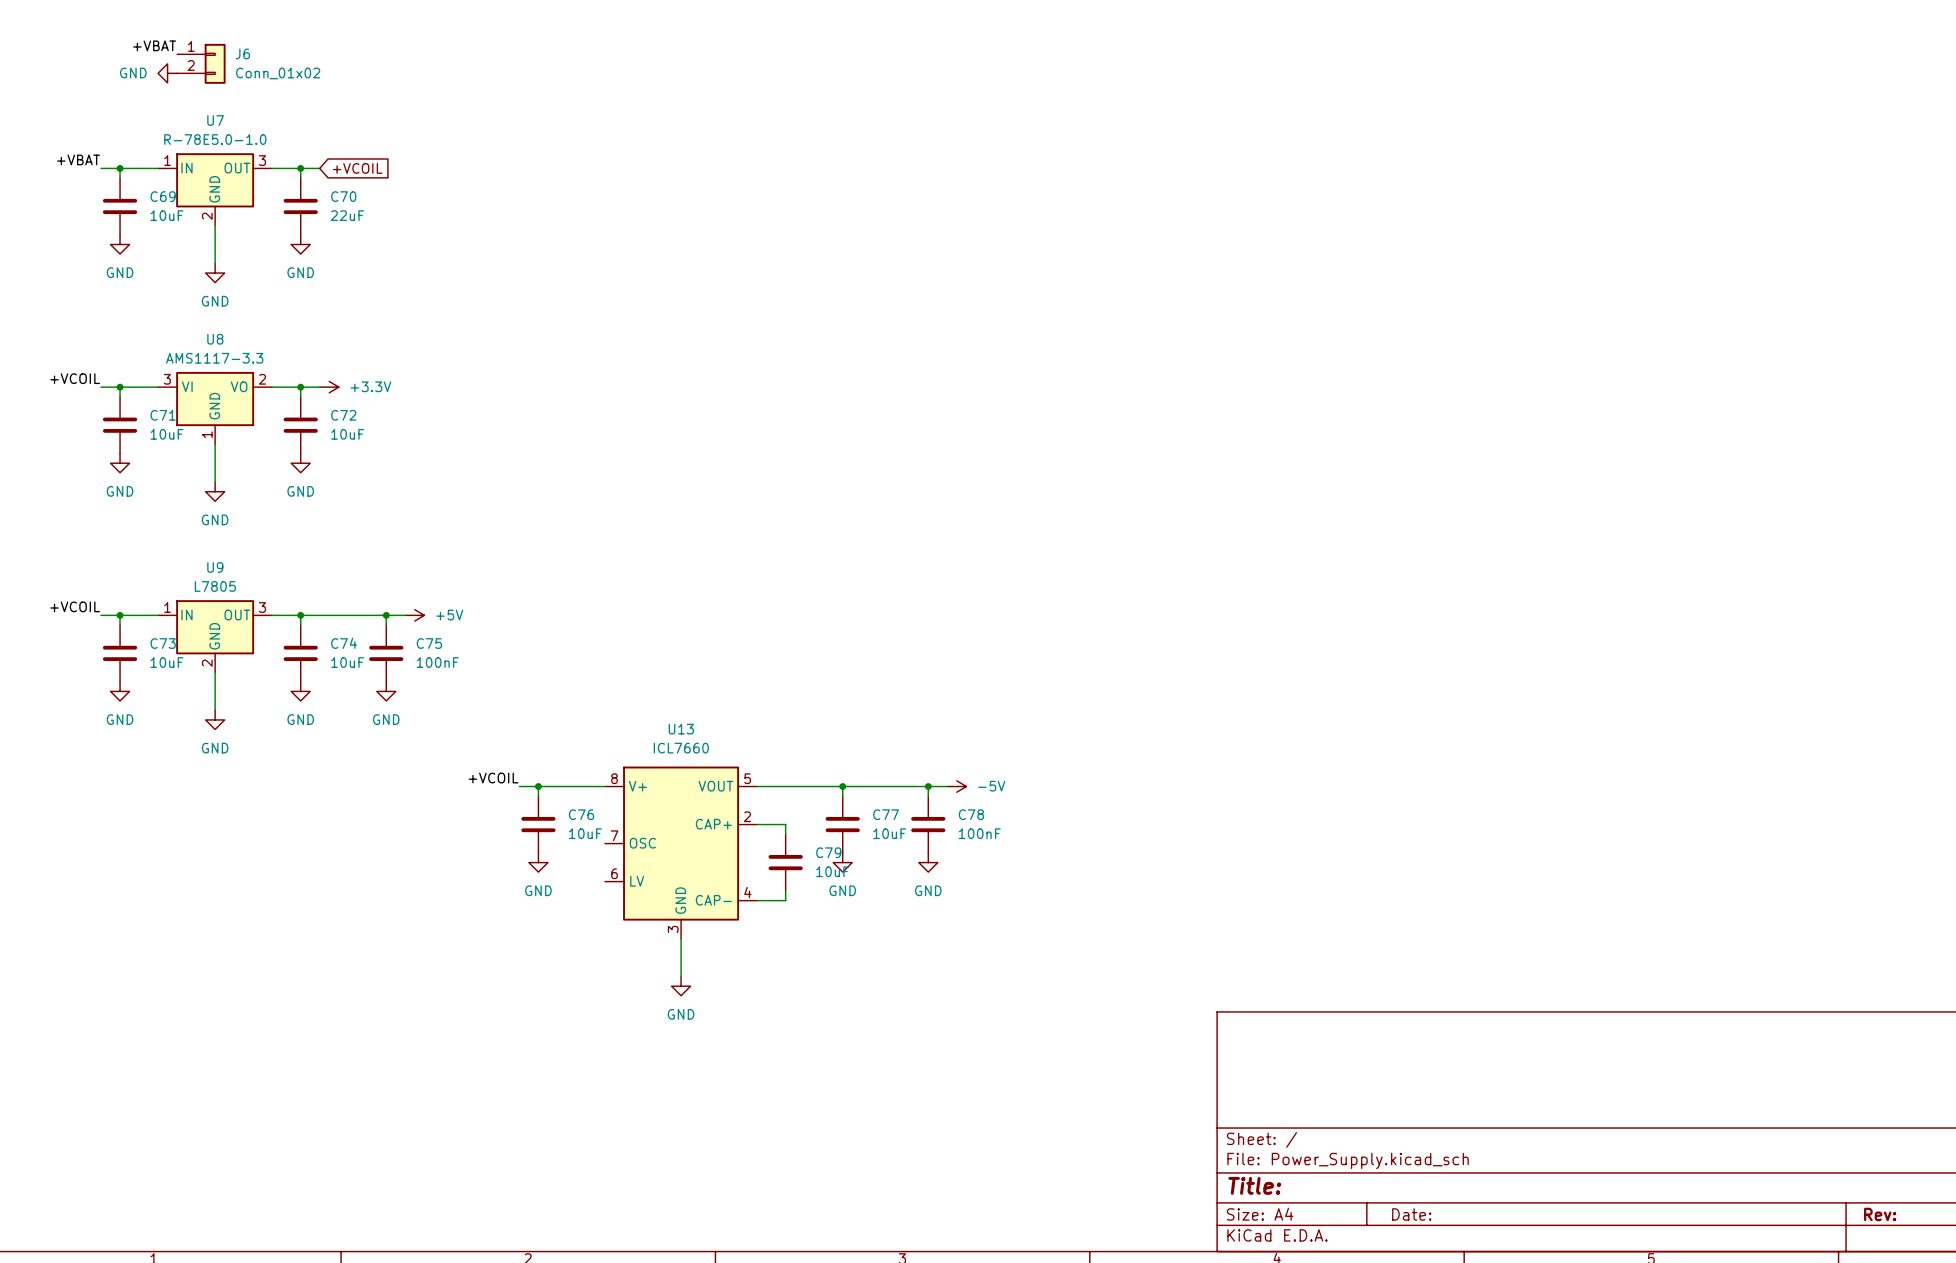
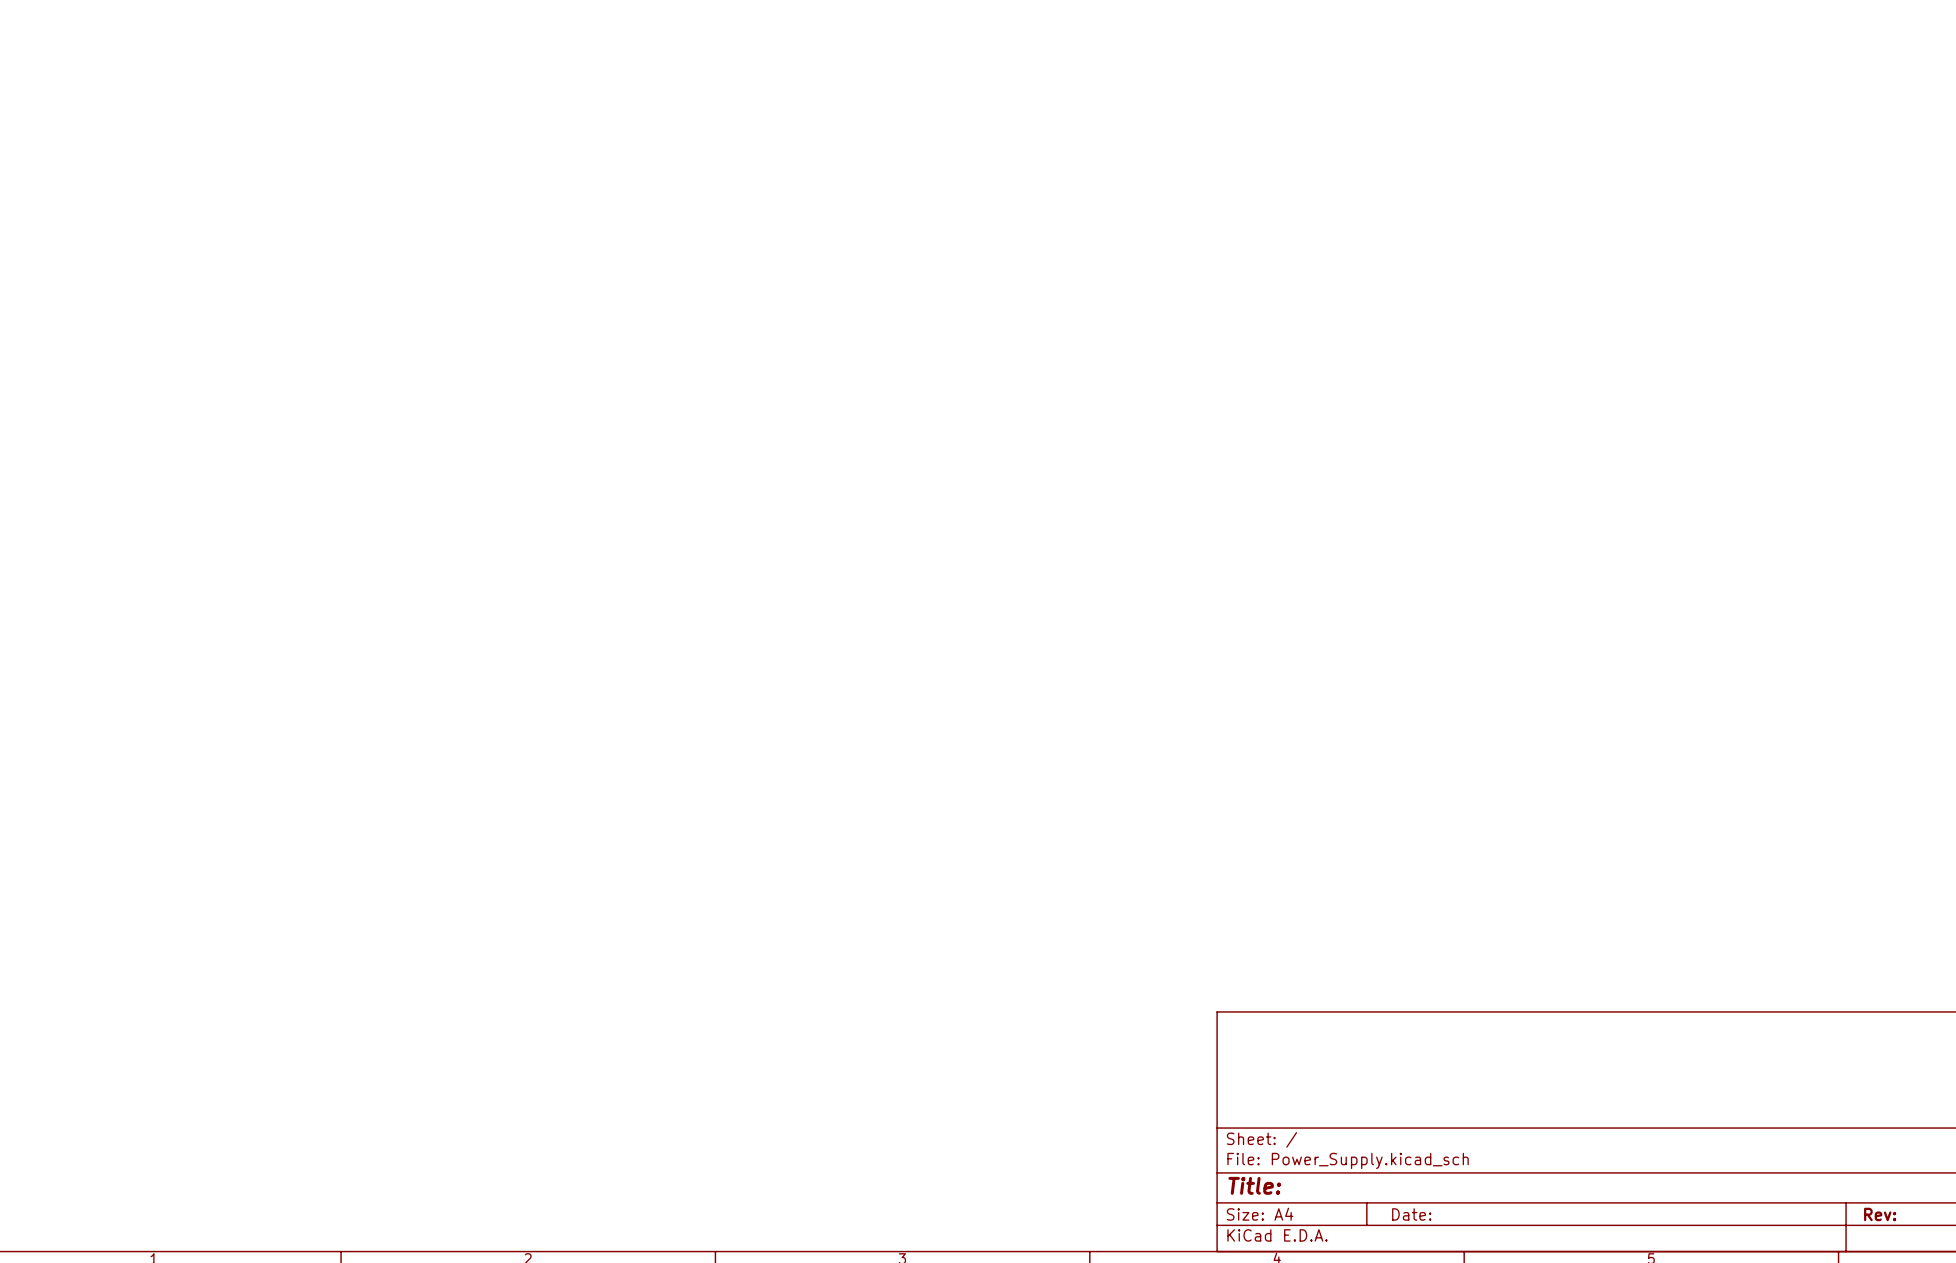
label: +VBAT (154, 45) -> none
J6: Conn_01x02 (201, 63) -> none
power symbol: GND (167, 73) -> none
label: +VBAT (78, 159) -> none
wire: (101, 168) (158, 168) -> none
wire: (120, 168) (120, 177) -> none
junction: (120, 168) -> none
wire: (272, 168) (319, 168) -> none
wire: (300, 168) (300, 177) -> none
junction: (300, 168) -> none
global label: +VCOIL (357, 168) -> none
U7: R-78E5.0-1.0 (215, 189) -> none
C69: 10uF (120, 206) -> none
C70: 22uF (300, 206) -> none
wire: (215, 225) (215, 263) -> none
power symbol: GND (120, 244) -> none
power symbol: GND (300, 244) -> none
power symbol: GND (215, 273) -> none
label: +VCOIL (75, 378) -> none
wire: (101, 387) (158, 387) -> none
wire: (120, 387) (120, 396) -> none
junction: (120, 387) -> none
wire: (272, 387) (319, 387) -> none
wire: (300, 387) (300, 396) -> none
junction: (300, 387) -> none
power symbol: +3.3V (329, 387) -> none
U8: AMS1117-3.3 (215, 408) -> none
C71: 10uF (120, 425) -> none
C72: 10uF (300, 425) -> none
wire: (215, 444) (215, 482) -> none
power symbol: GND (120, 463) -> none
power symbol: GND (300, 463) -> none
power symbol: GND (215, 491) -> none
label: +VCOIL (75, 606) -> none
wire: (101, 615) (158, 615) -> none
wire: (120, 615) (120, 624) -> none
junction: (120, 615) -> none
wire: (272, 615) (405, 615) -> none
wire: (300, 615) (300, 624) -> none
junction: (300, 615) -> none
wire: (386, 615) (386, 624) -> none
junction: (386, 615) -> none
power symbol: +5V (414, 615) -> none
U9: L7805 (215, 636) -> none
C73: 10uF (120, 653) -> none
C74: 10uF (300, 653) -> none
C75: 100nF (386, 653) -> none
wire: (215, 672) (215, 710) -> none
power symbol: GND (120, 691) -> none
power symbol: GND (300, 691) -> none
power symbol: GND (386, 691) -> none
power symbol: GND (215, 719) -> none
label: +VCOIL (493, 778) -> none
wire: (519, 786) (604, 786) -> none
wire: (538, 786) (538, 796) -> none
junction: (538, 786) -> none
wire: (757, 786) (947, 786) -> none
wire: (842, 786) (842, 796) -> none
junction: (842, 786) -> none
wire: (928, 786) (928, 796) -> none
junction: (928, 786) -> none
power symbol: -5V (956, 786) -> none
C76: 10uF (538, 824) -> none
wire: (757, 824) (785, 824) (785, 834) -> none
C77: 10uF (842, 824) -> none
C78: 100nF (928, 824) -> none
U13: ICL7660 (681, 852) -> none
power symbol: GND (538, 862) -> none
C79: 10uF (785, 862) -> none
power symbol: GND (842, 862) -> none
power symbol: GND (928, 862) -> none
wire: (785, 891) (785, 900) (757, 900) -> none
wire: (681, 938) (681, 976) -> none
power symbol: GND (681, 986) -> none

